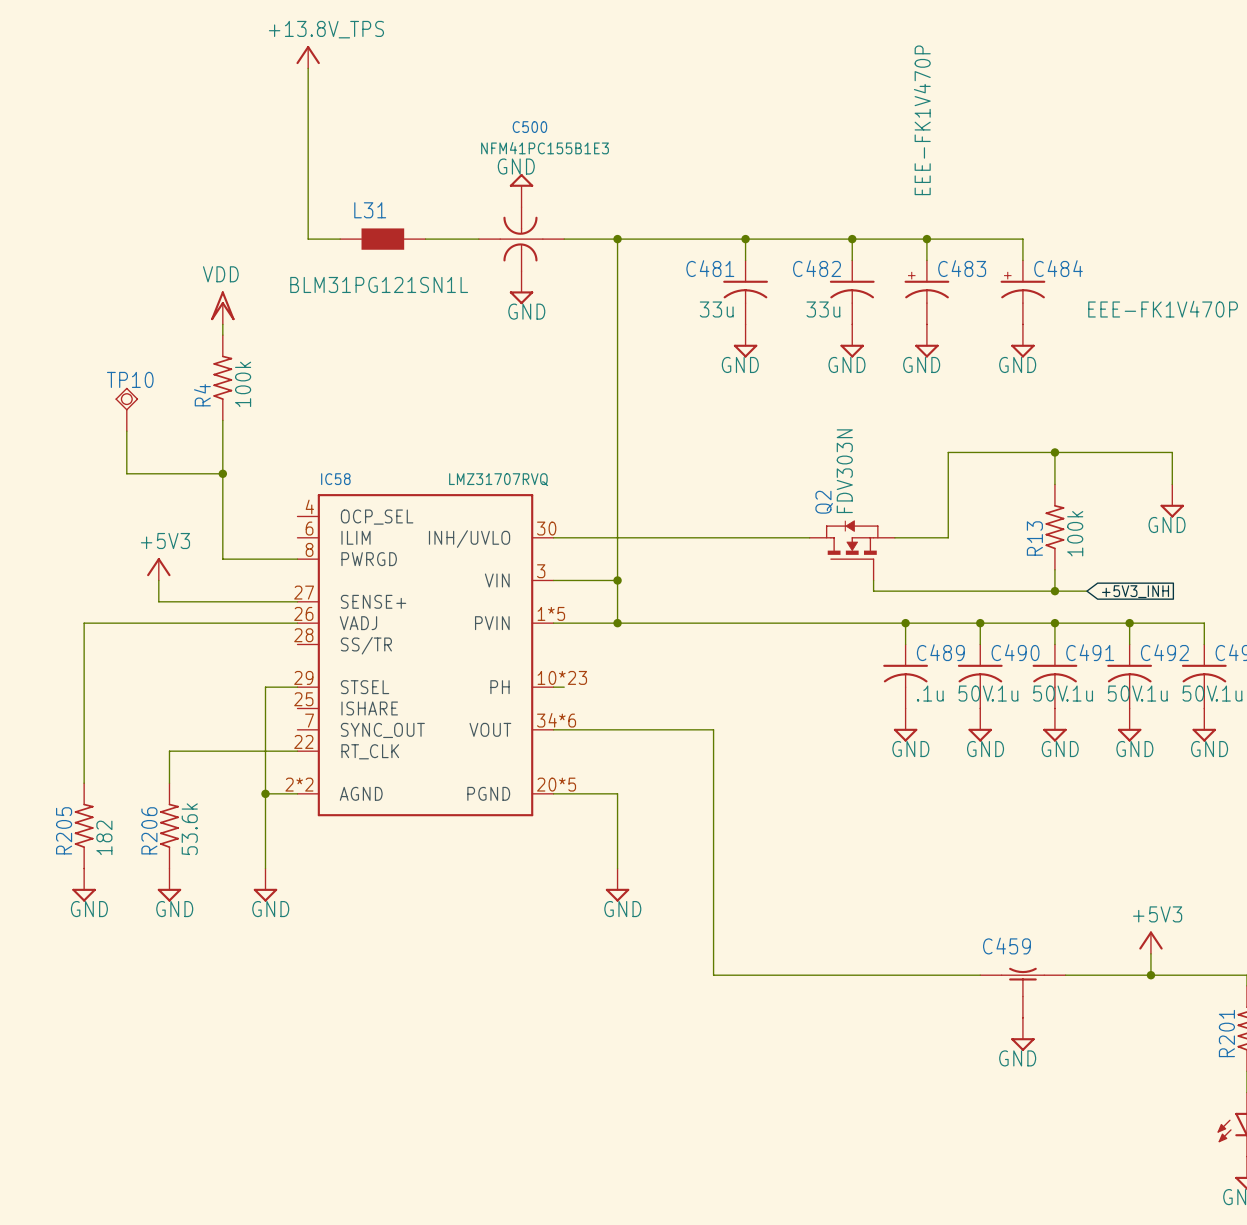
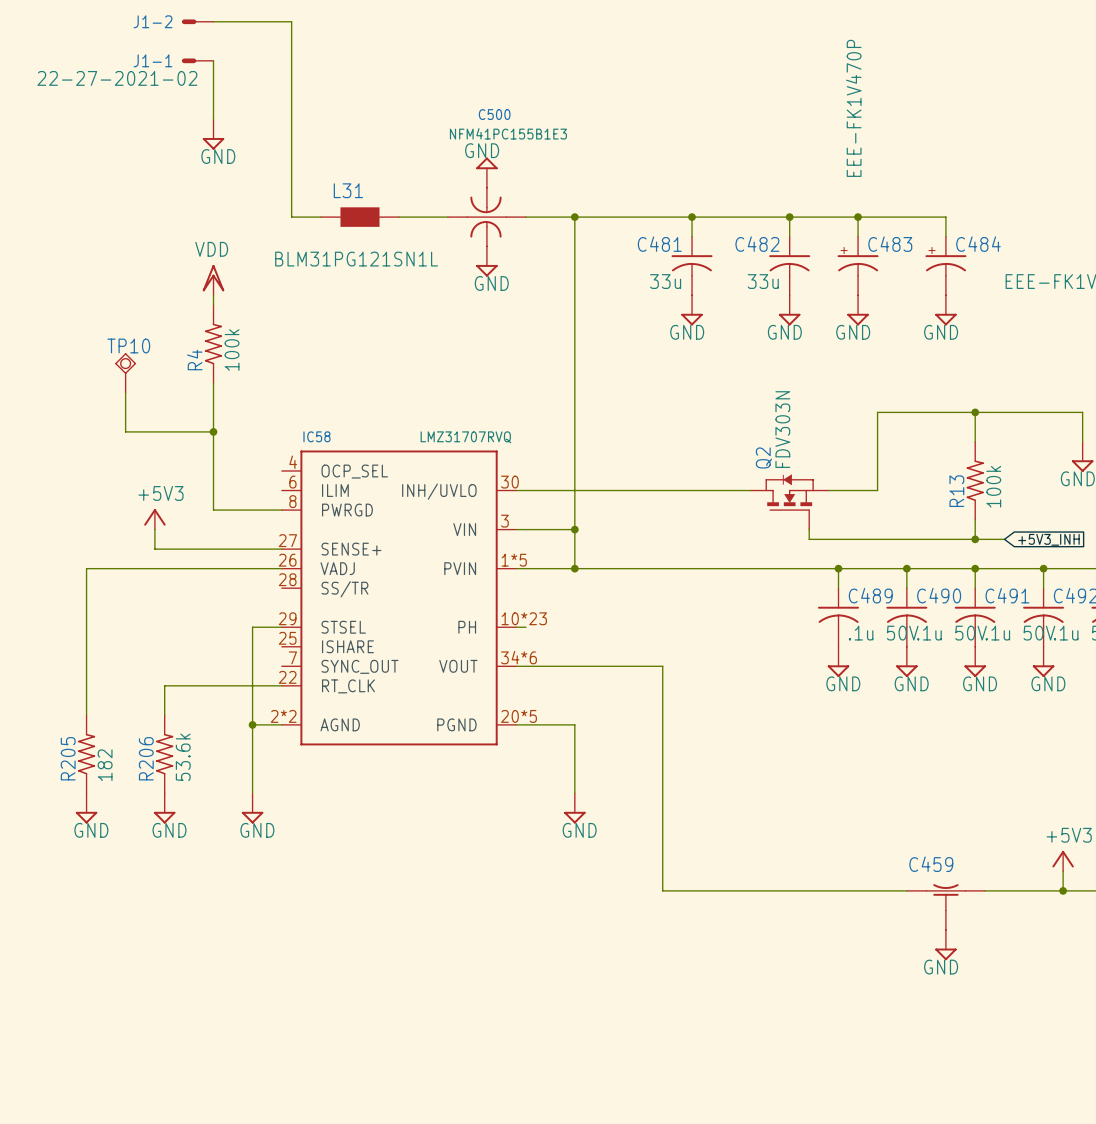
J1-2: none -> (197, 21)
wire: none -> (213, 21) (291, 21) (291, 60)
power symbol: +13.8V_TPS (308, 57) -> none
J1-1: none -> 22-27-2021-02 (197, 60)
wire: none -> (213, 60) (213, 119)
power symbol: none -> GND (213, 134)

